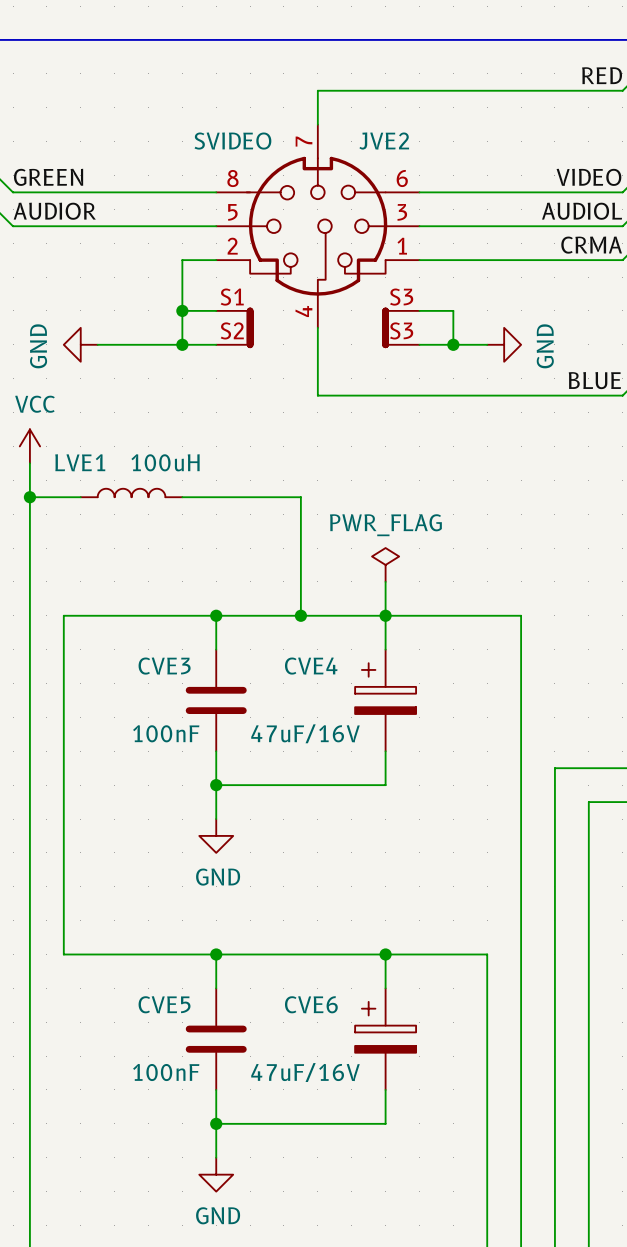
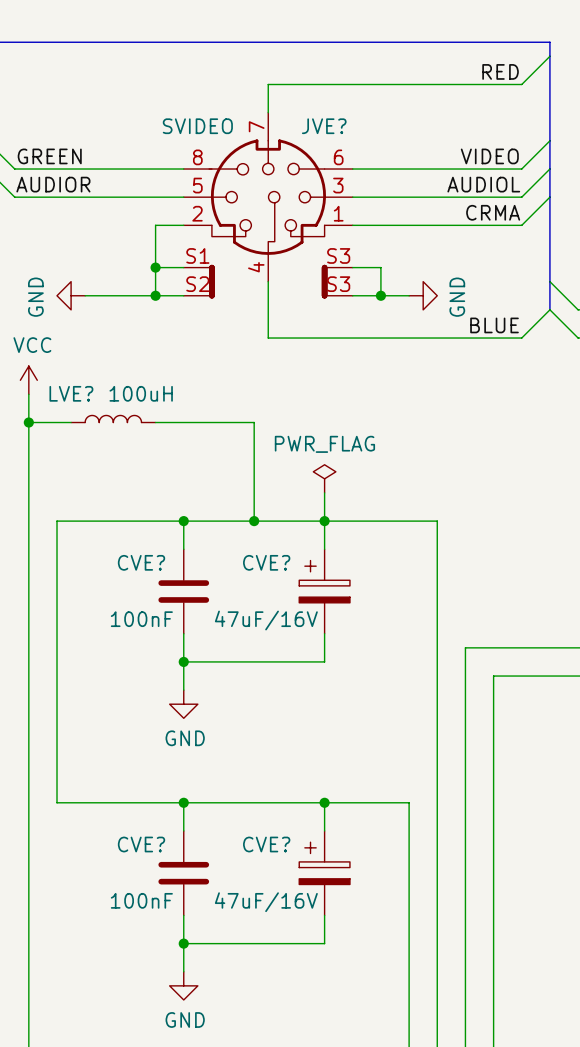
JVE2 name: JVE2 (384, 141) -> JVE? (324, 126)
LVE1 name: LVE1 (80, 462) -> LVE? (71, 393)
CVE3 name: CVE3 (164, 666) -> CVE? (141, 562)
CVE4 name: CVE4 (311, 666) -> CVE? (266, 562)
CVE5 name: CVE5 (164, 1004) -> CVE? (141, 844)
CVE6 name: CVE6 (311, 1004) -> CVE? (266, 844)

